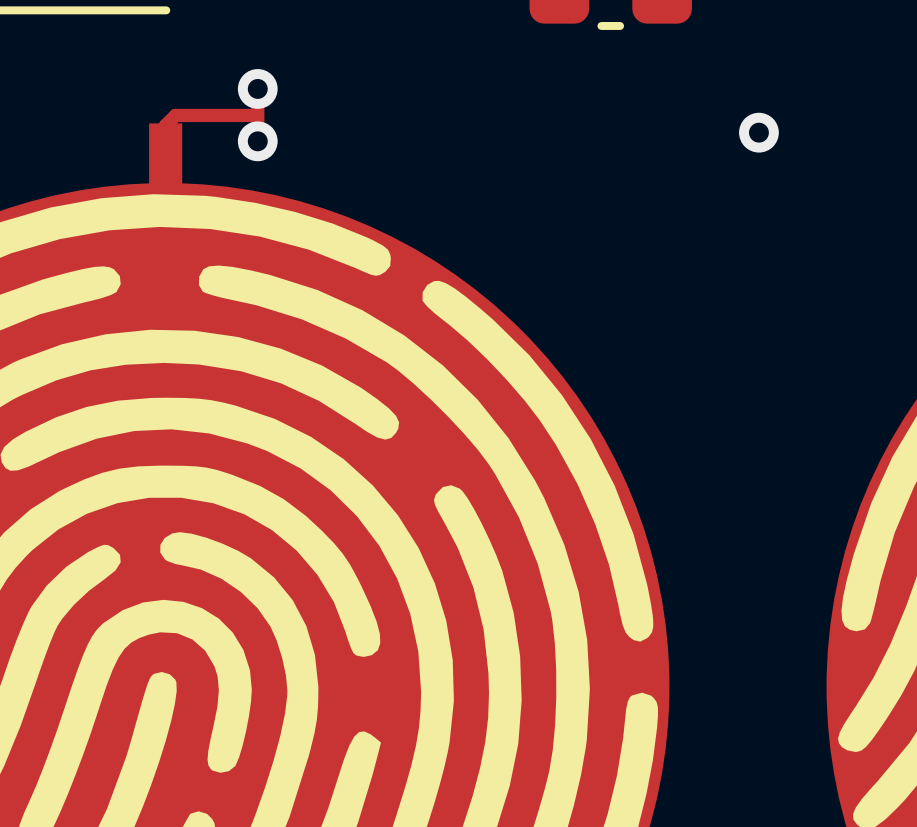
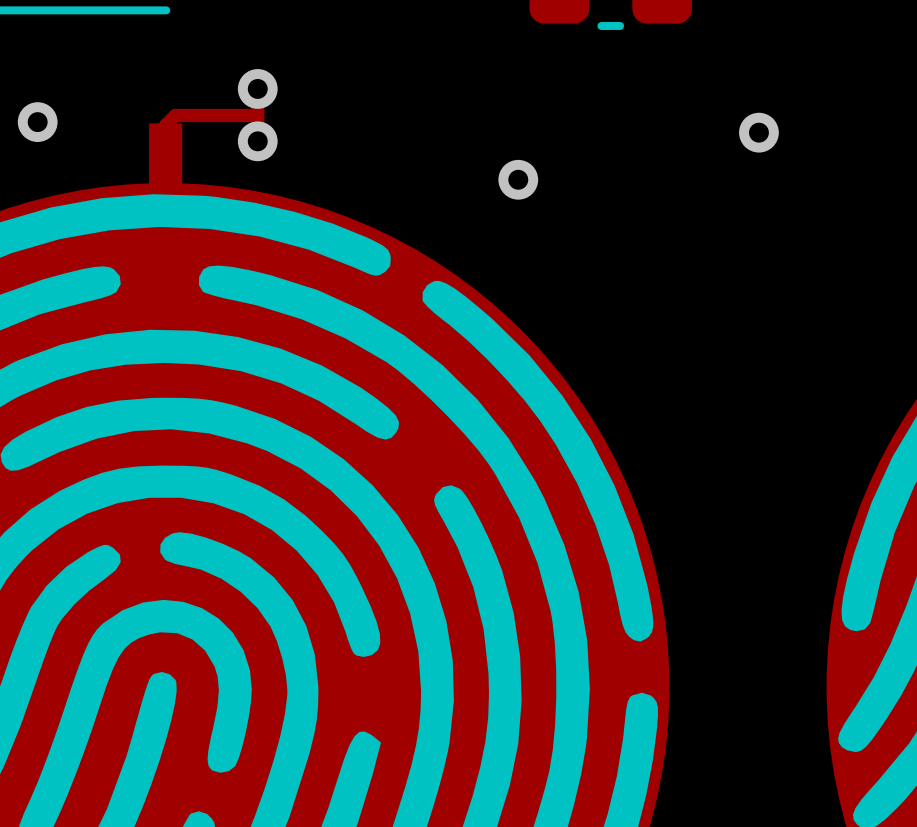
via: none -> (37, 122)
via: none -> (518, 179)

